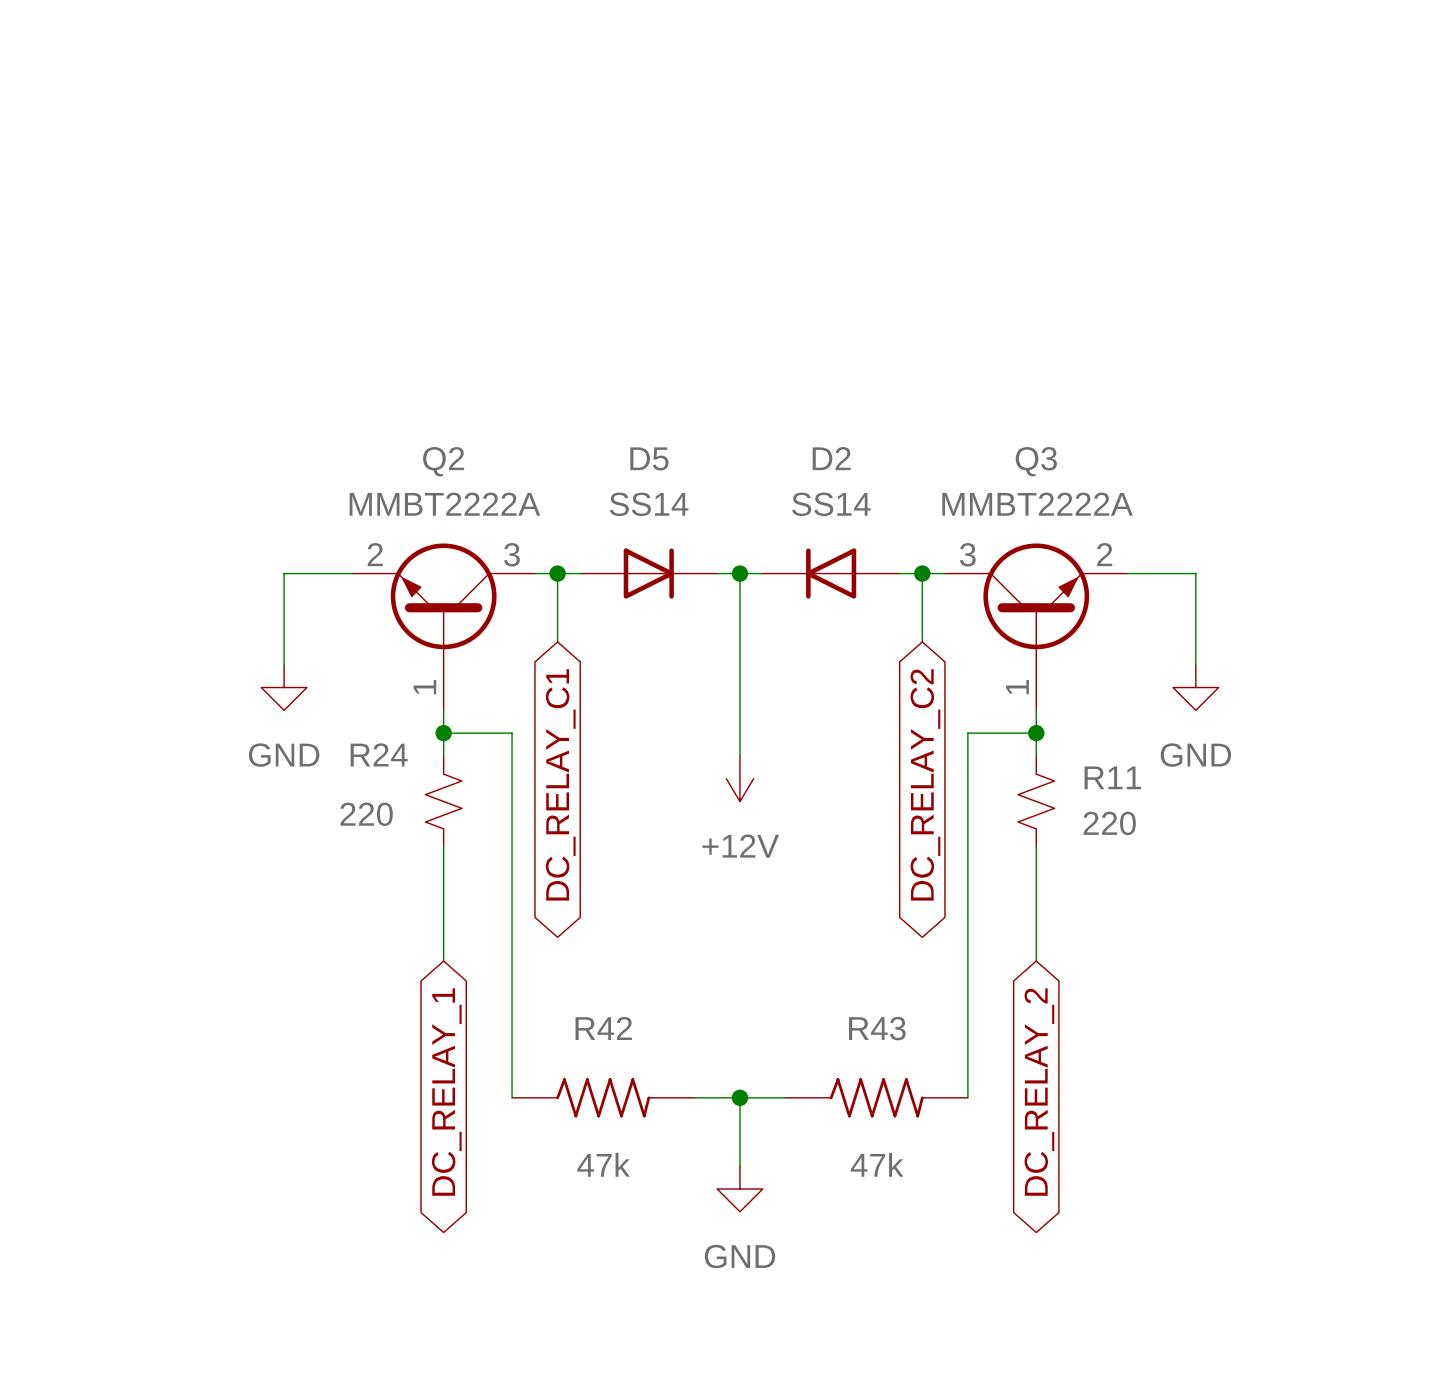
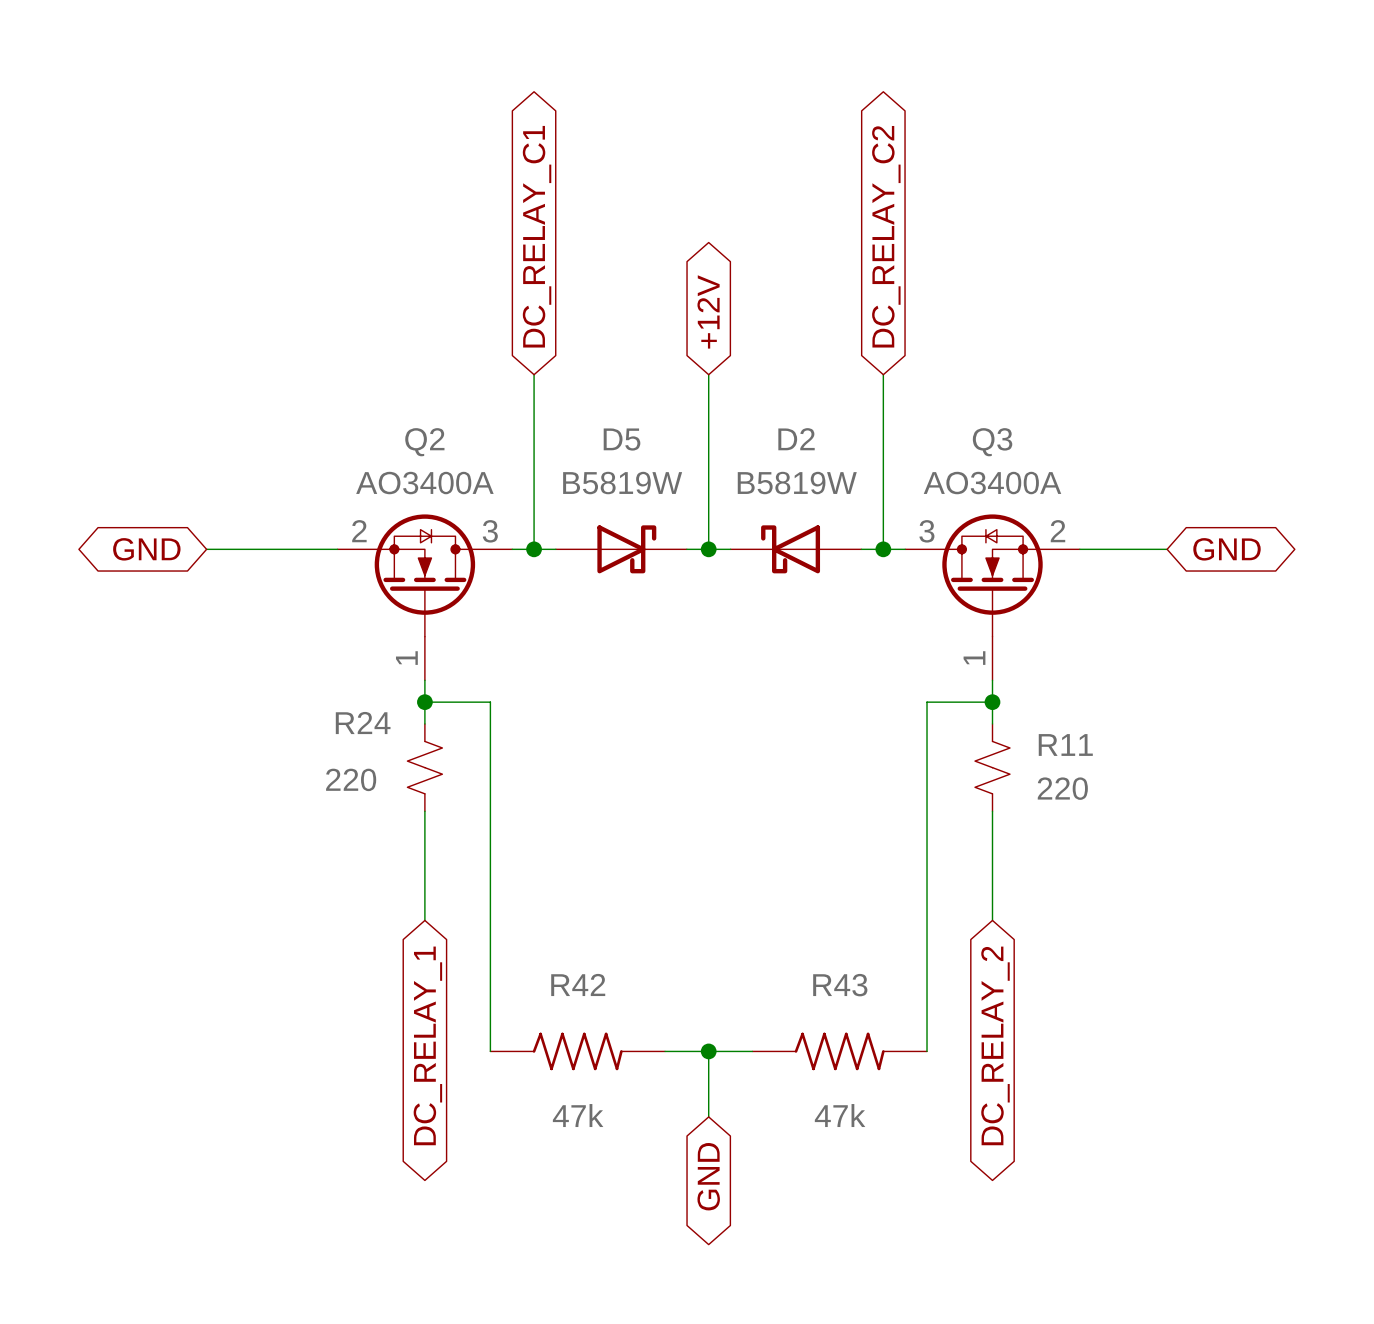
global label: none -> +12V (708, 311)
Q2 value: MMBT2222A (444, 504) -> AO3400A (424, 483)
D5 value: SS14 (649, 504) -> B5819W (622, 483)
D2 value: SS14 (831, 504) -> B5819W (797, 483)
Q3 value: MMBT2222A (1037, 504) -> AO3400A (992, 483)
Q2 symbol: [352, 543, 535, 711] -> [337, 514, 513, 681]
Q3 symbol: [945, 543, 1128, 711] -> [905, 514, 1080, 681]
D5 symbol: [580, 548, 718, 599] -> [555, 525, 687, 574]
D2 symbol: [762, 548, 900, 599] -> [730, 525, 862, 574]
global label: none -> GND (146, 549)
wire: (284, 573) (284, 664) -> (272, 549) (206, 549)
wire: (557, 573) (557, 641) -> (534, 549) (534, 374)
wire: (739, 573) (739, 755) -> (708, 549) (708, 374)
wire: (922, 573) (922, 641) -> (883, 549) (883, 374)
wire: (1195, 573) (1195, 664) -> (1145, 549) (1167, 549)
global label: none -> GND (1226, 549)
power symbol: GND (284, 687) -> none
power symbol: GND (1195, 687) -> none
power symbol: +12V (739, 778) -> none
global label rotation: 0° (560, 784) -> 180° (537, 236)
global label position: DC_RELAY_C1 (560, 784) -> DC_RELAY_C1 (537, 236)
global label rotation: 0° (925, 784) -> 180° (886, 236)
global label position: DC_RELAY_C2 (925, 784) -> DC_RELAY_C2 (886, 236)
power symbol: GND (739, 1189) -> none
global label: none -> GND (708, 1176)

